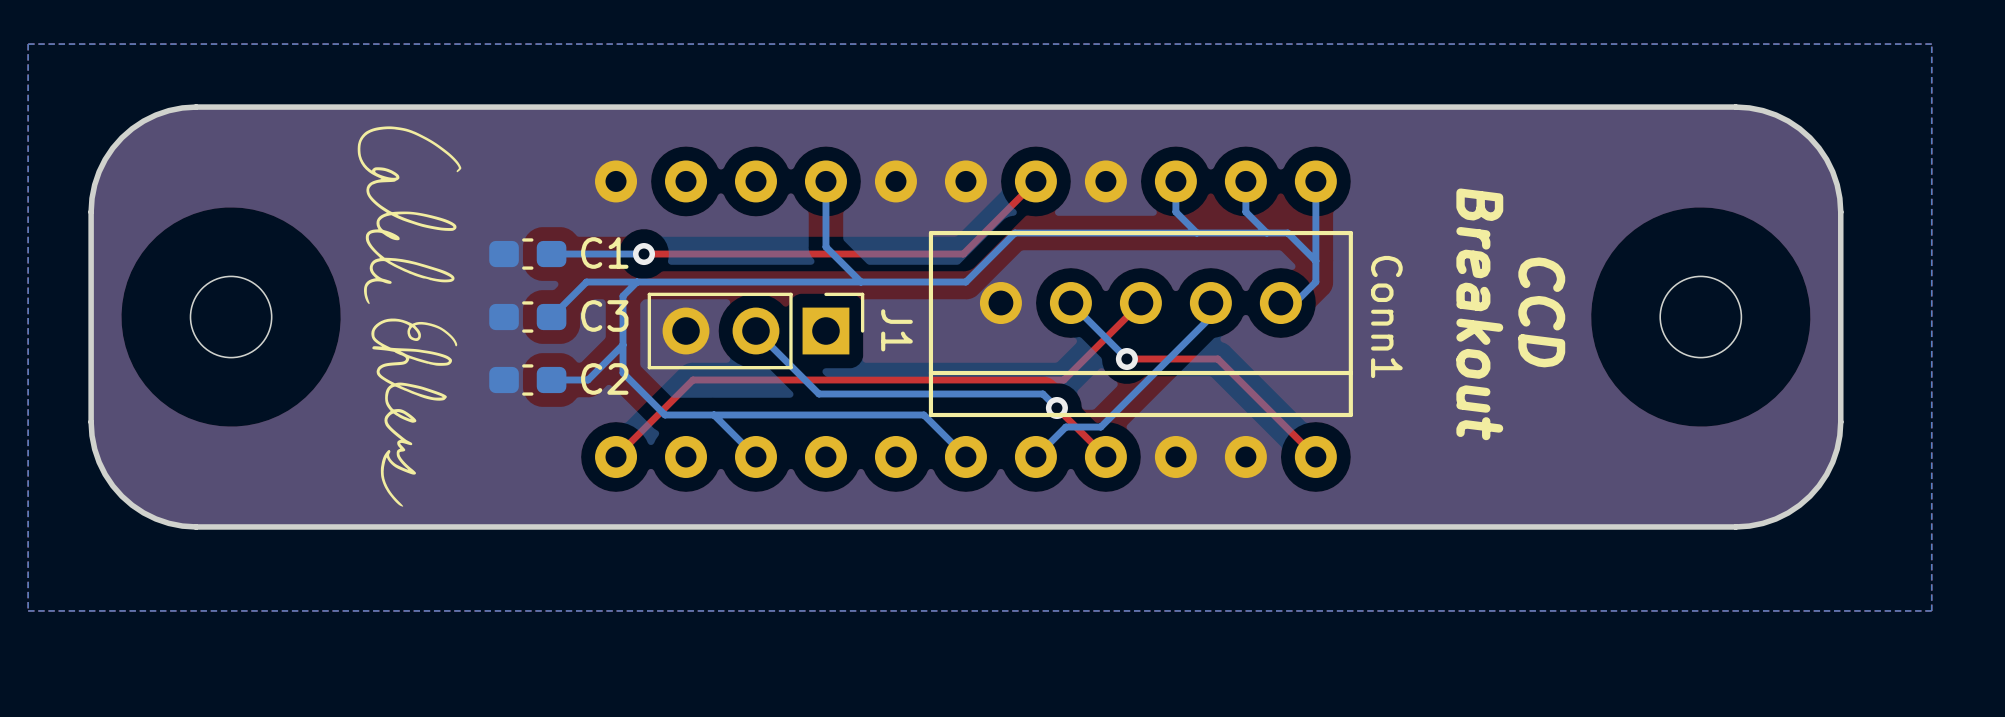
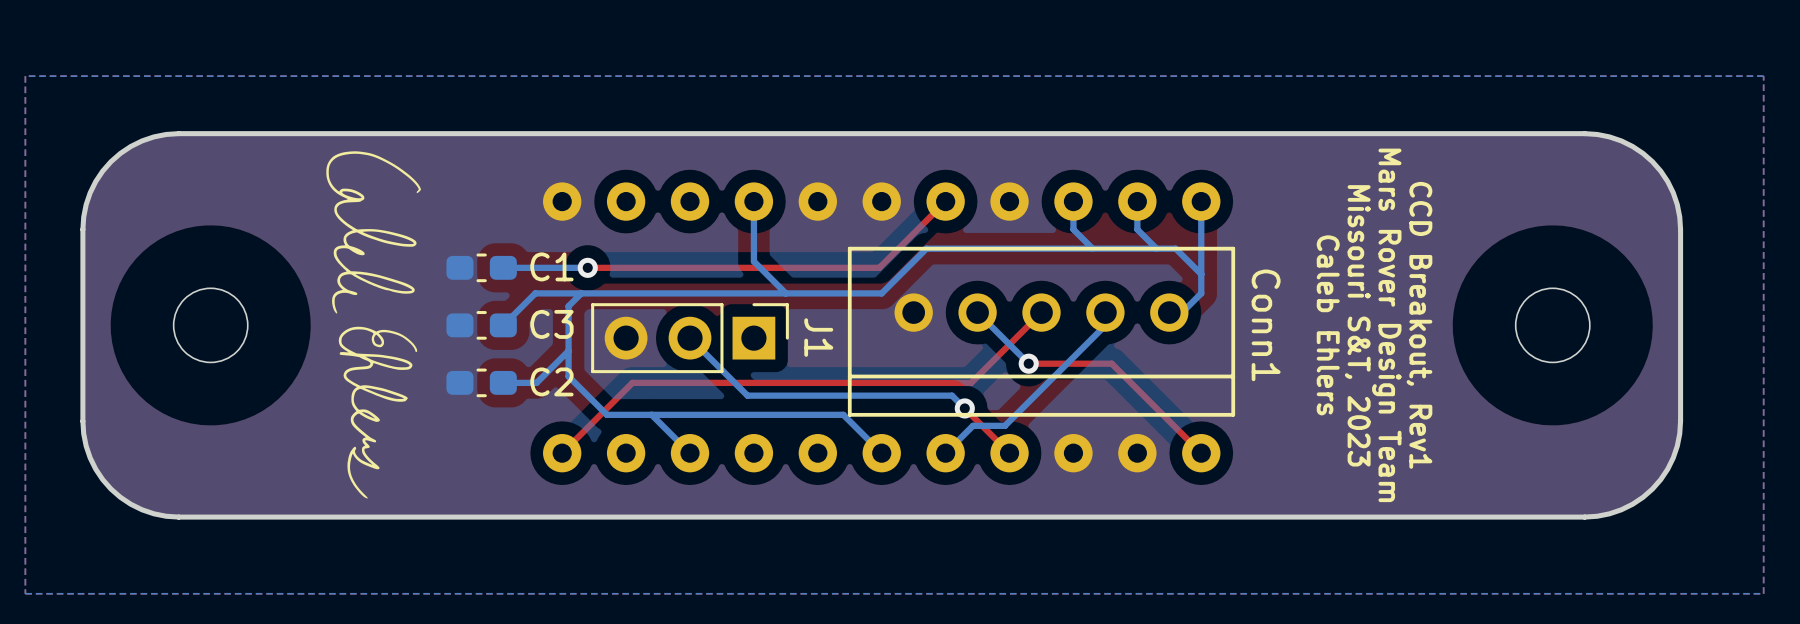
text: CCD (1541, 312) -> Mars Rover Design Team (1386, 325)
text: Breakout (1479, 314) -> none
text: none -> Caleb Ehlers (1328, 325)
text: none -> Missouri S&T, 2023 (1357, 325)
text: none -> CCD Breakout, Rev1 (1419, 325)

